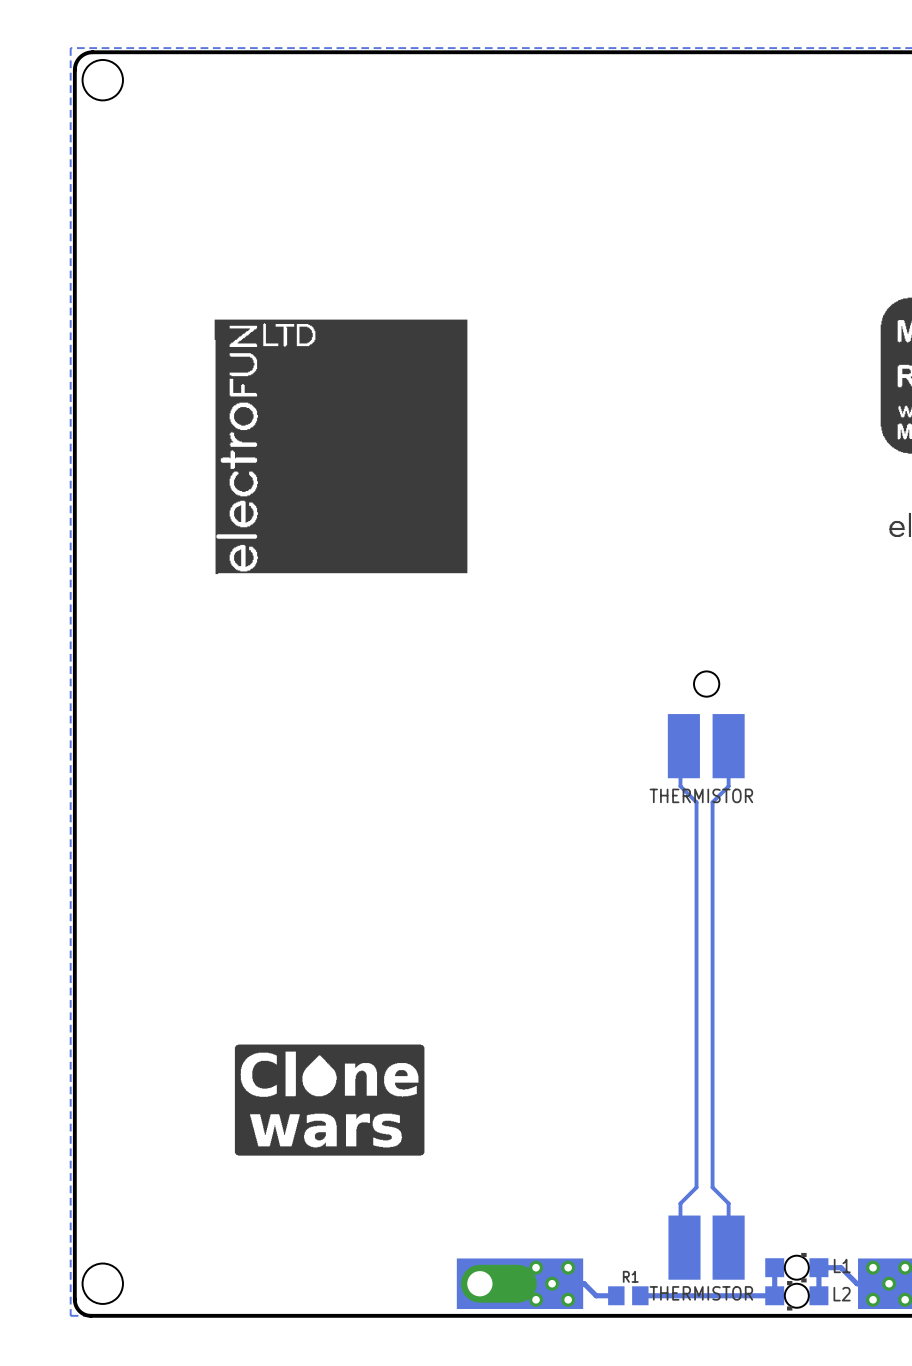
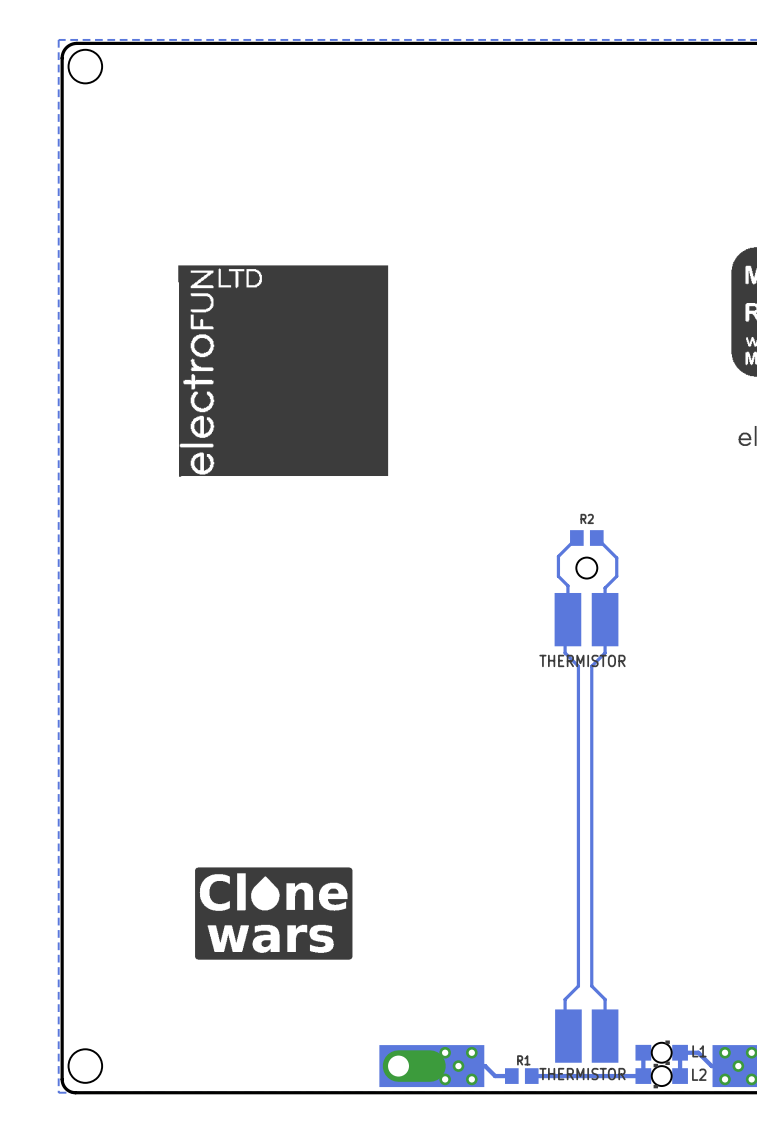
track: none -> (576, 538) (558, 556) (558, 576) (567, 585) (567, 615)
R2: none -> (586, 538)
track: none -> (596, 538) (616, 557) (616, 576) (605, 587) (605, 619)

